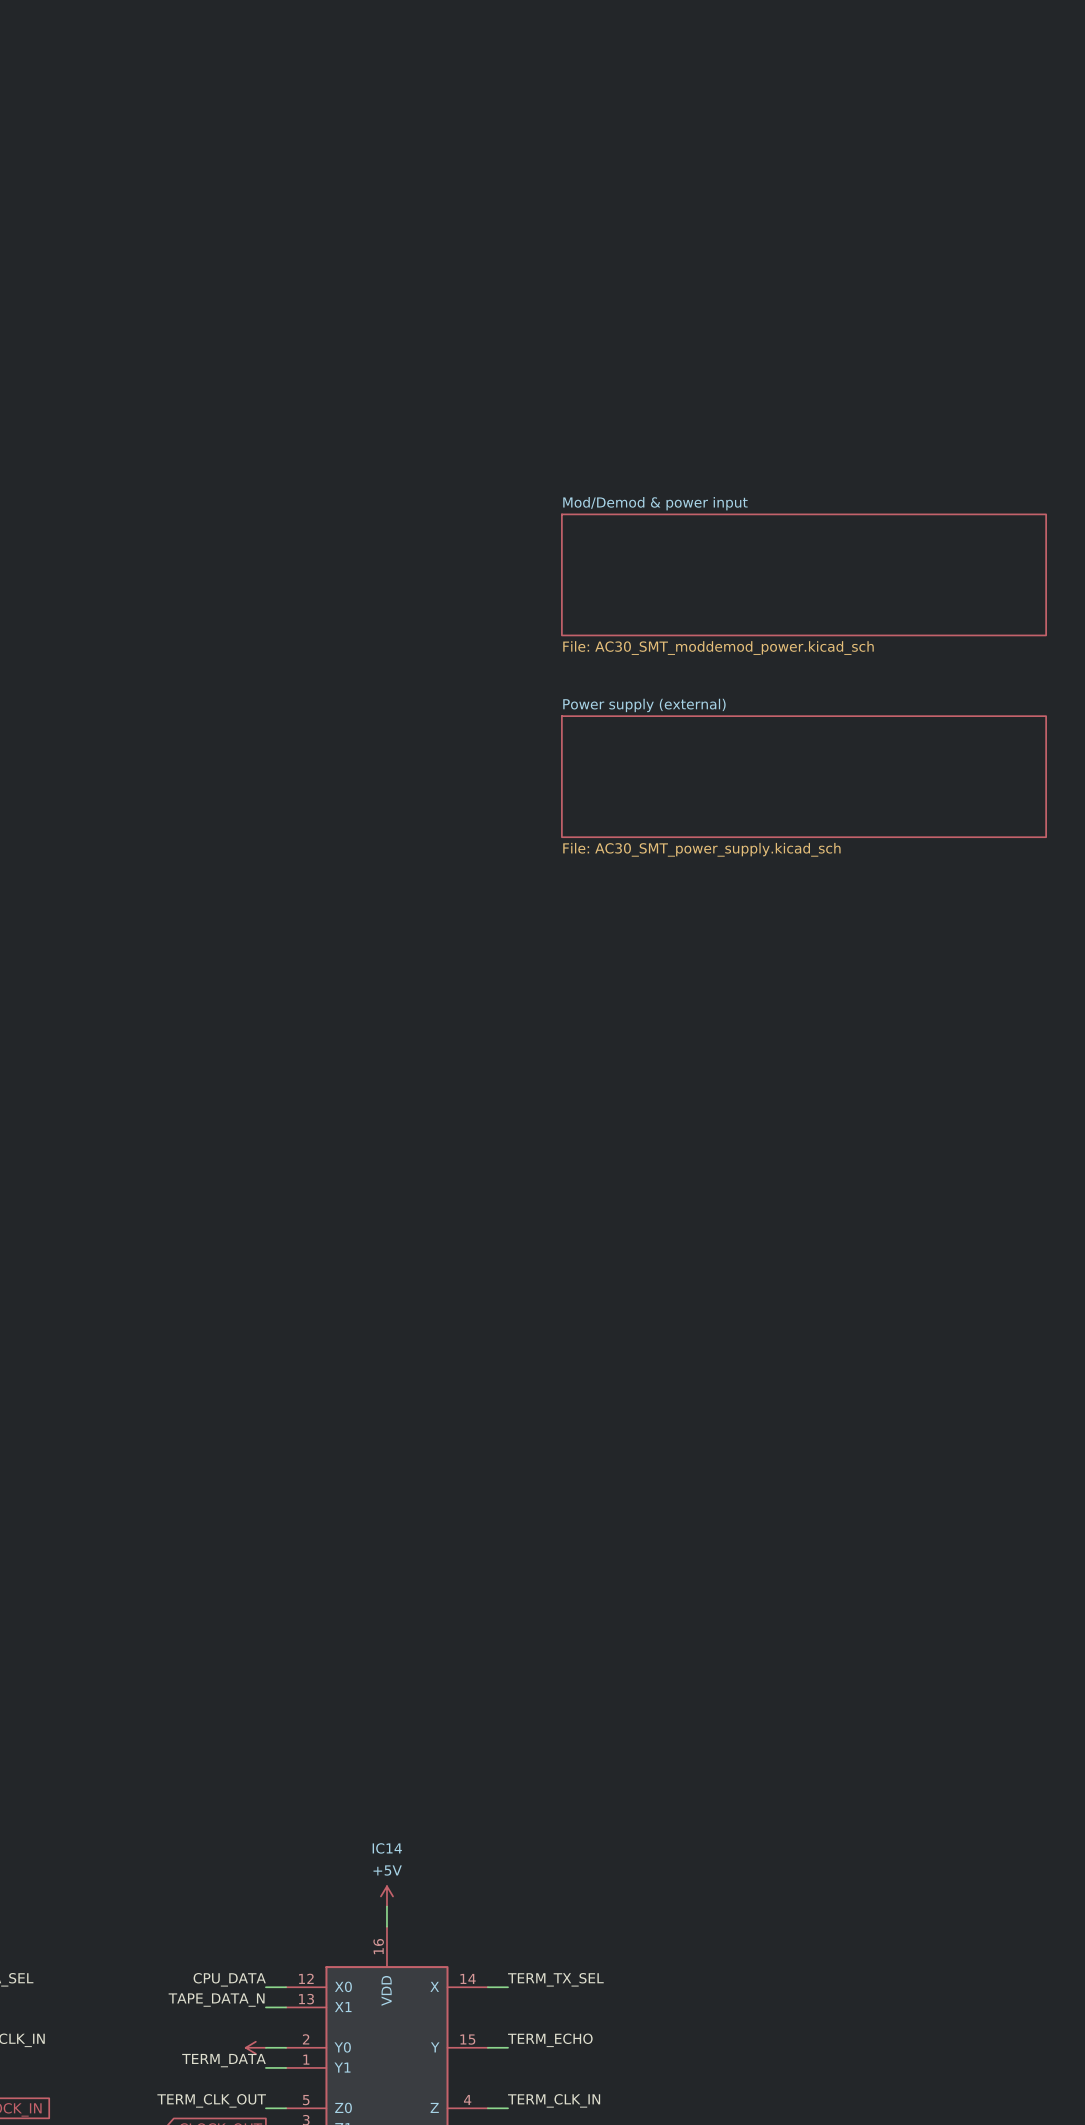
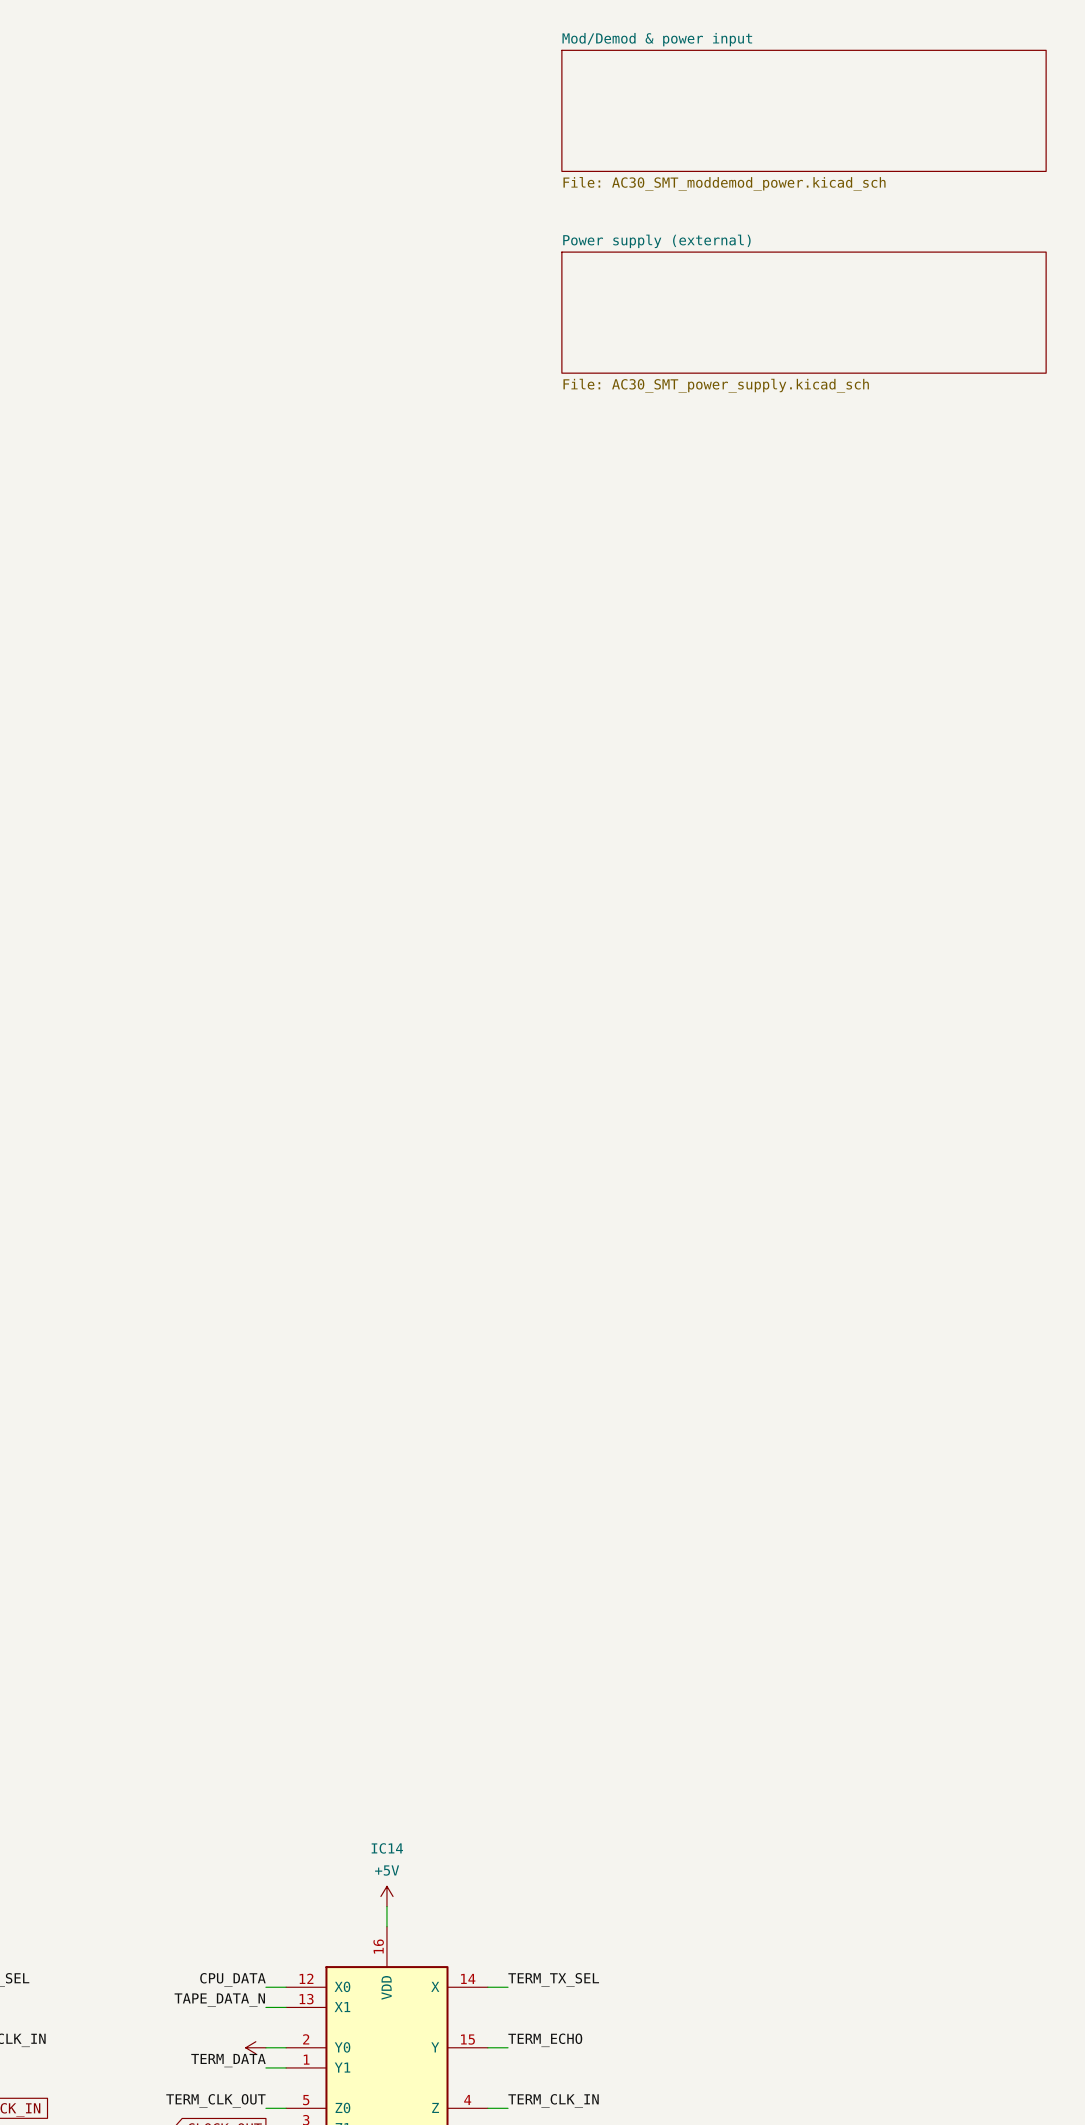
sheet Mod/Demod & power input: none -> File: AC30_SMT_moddemod_power.kicad_sch (804, 110)
sheet Power supply (external): none -> File: AC30_SMT_power_supply.kicad_sch (804, 312)
sheet Mod/Demod & power input: File: AC30_SMT_moddemod_power.kicad_sch (804, 574) -> none
sheet Power supply (external): File: AC30_SMT_power_supply.kicad_sch (804, 776) -> none

